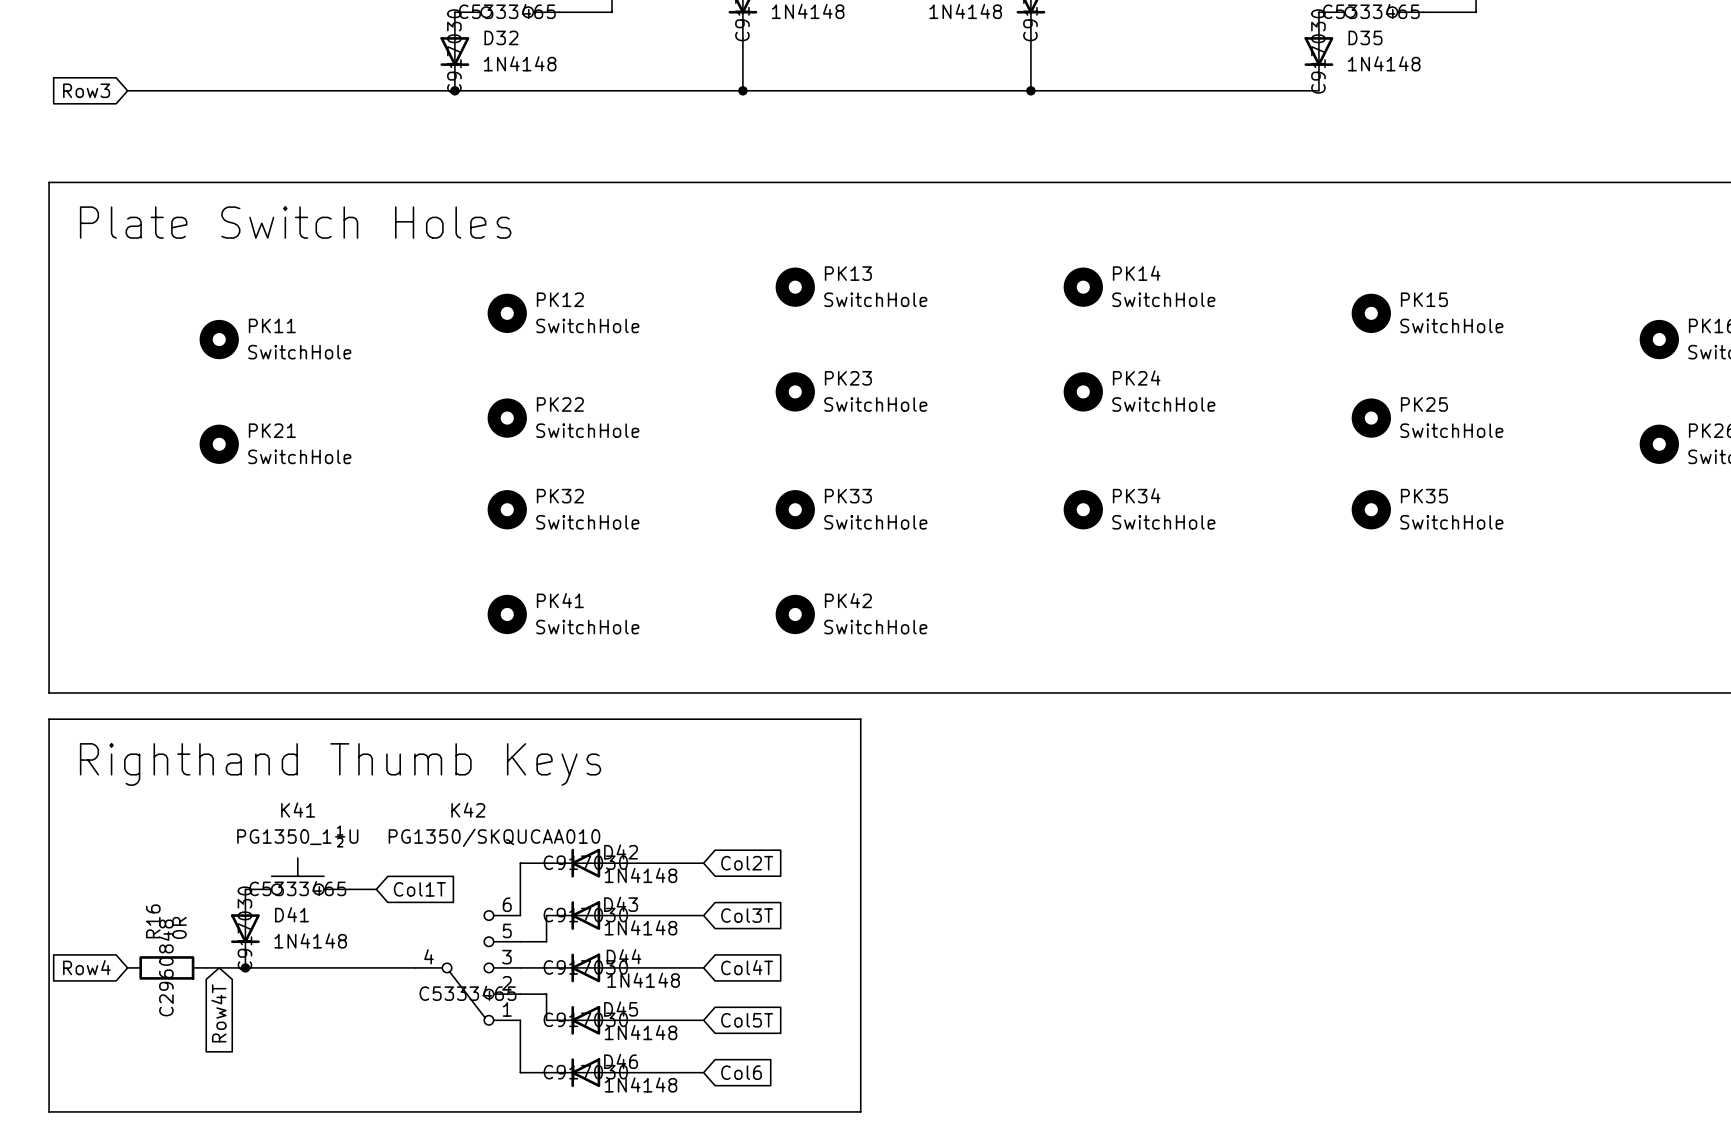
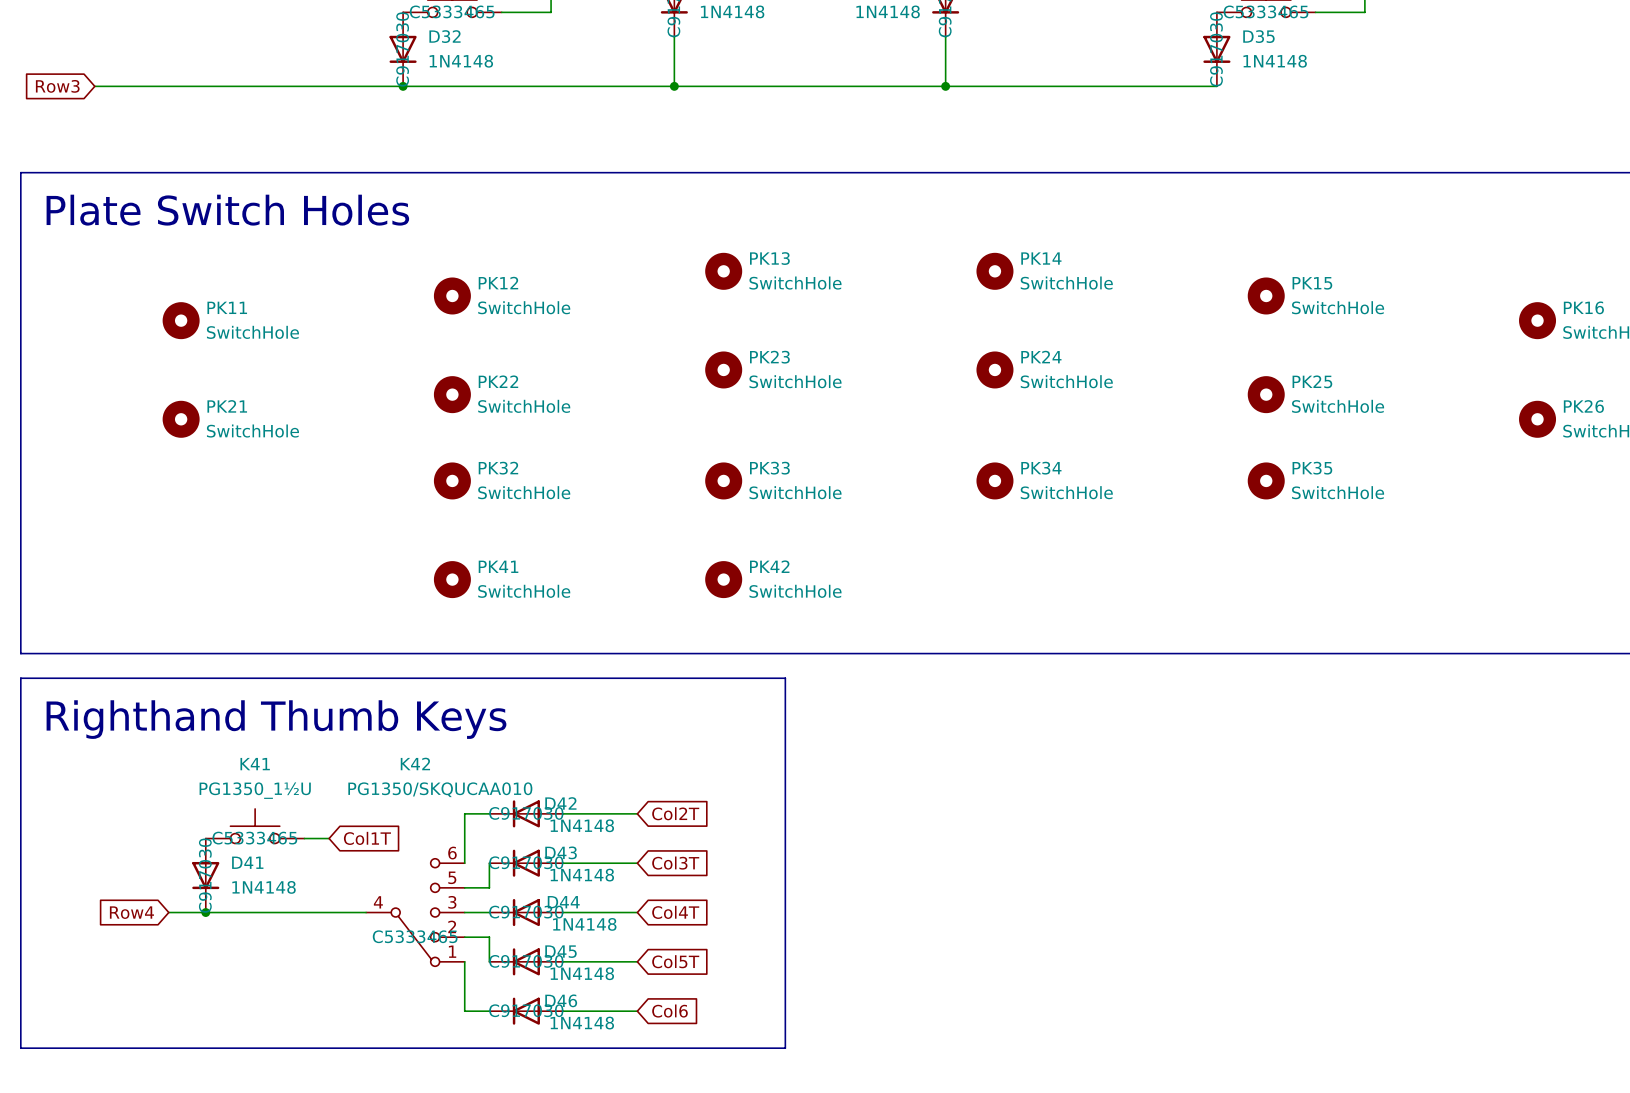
global label position: Row4 (86, 967) -> Row4 (131, 912)
R16: 0R (166, 967) -> none
global label: Row4T (218, 1013) -> none

